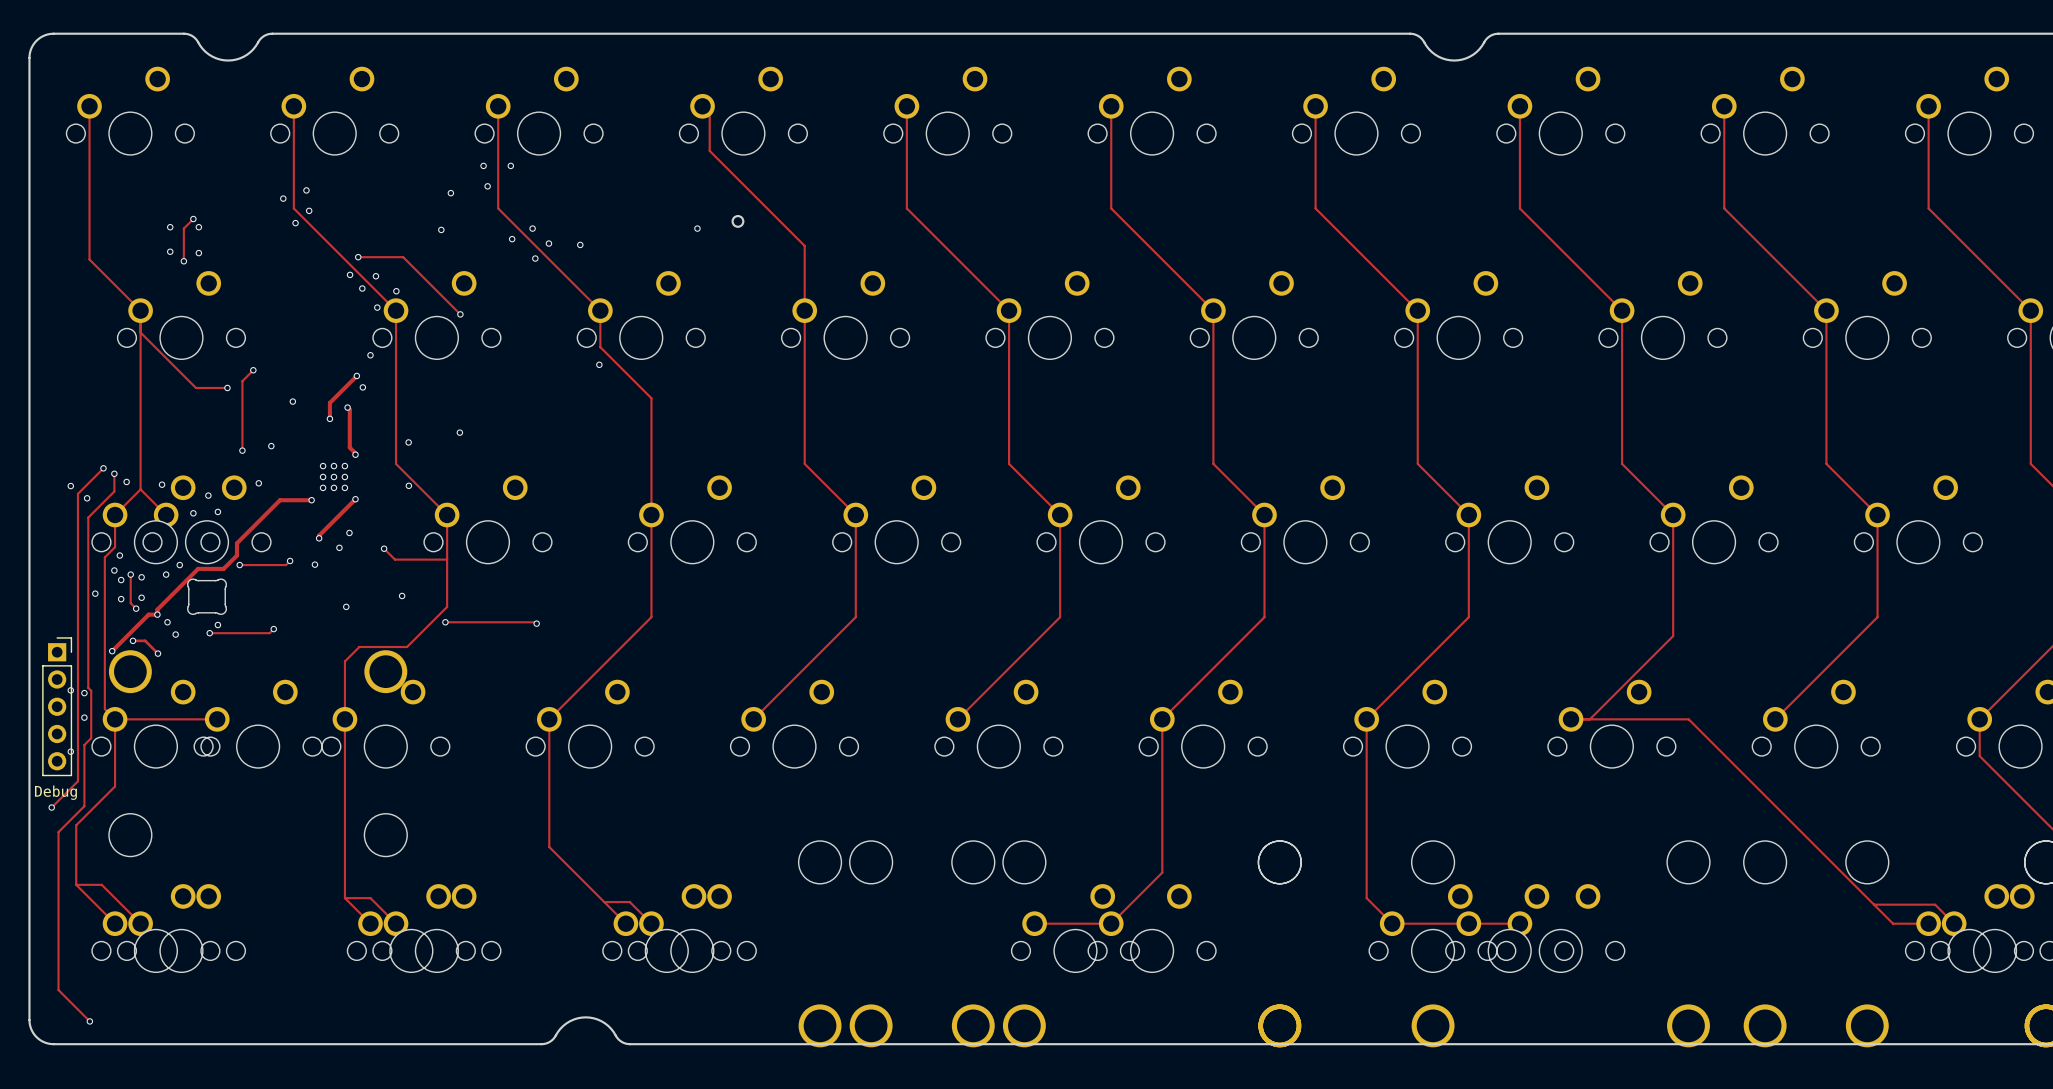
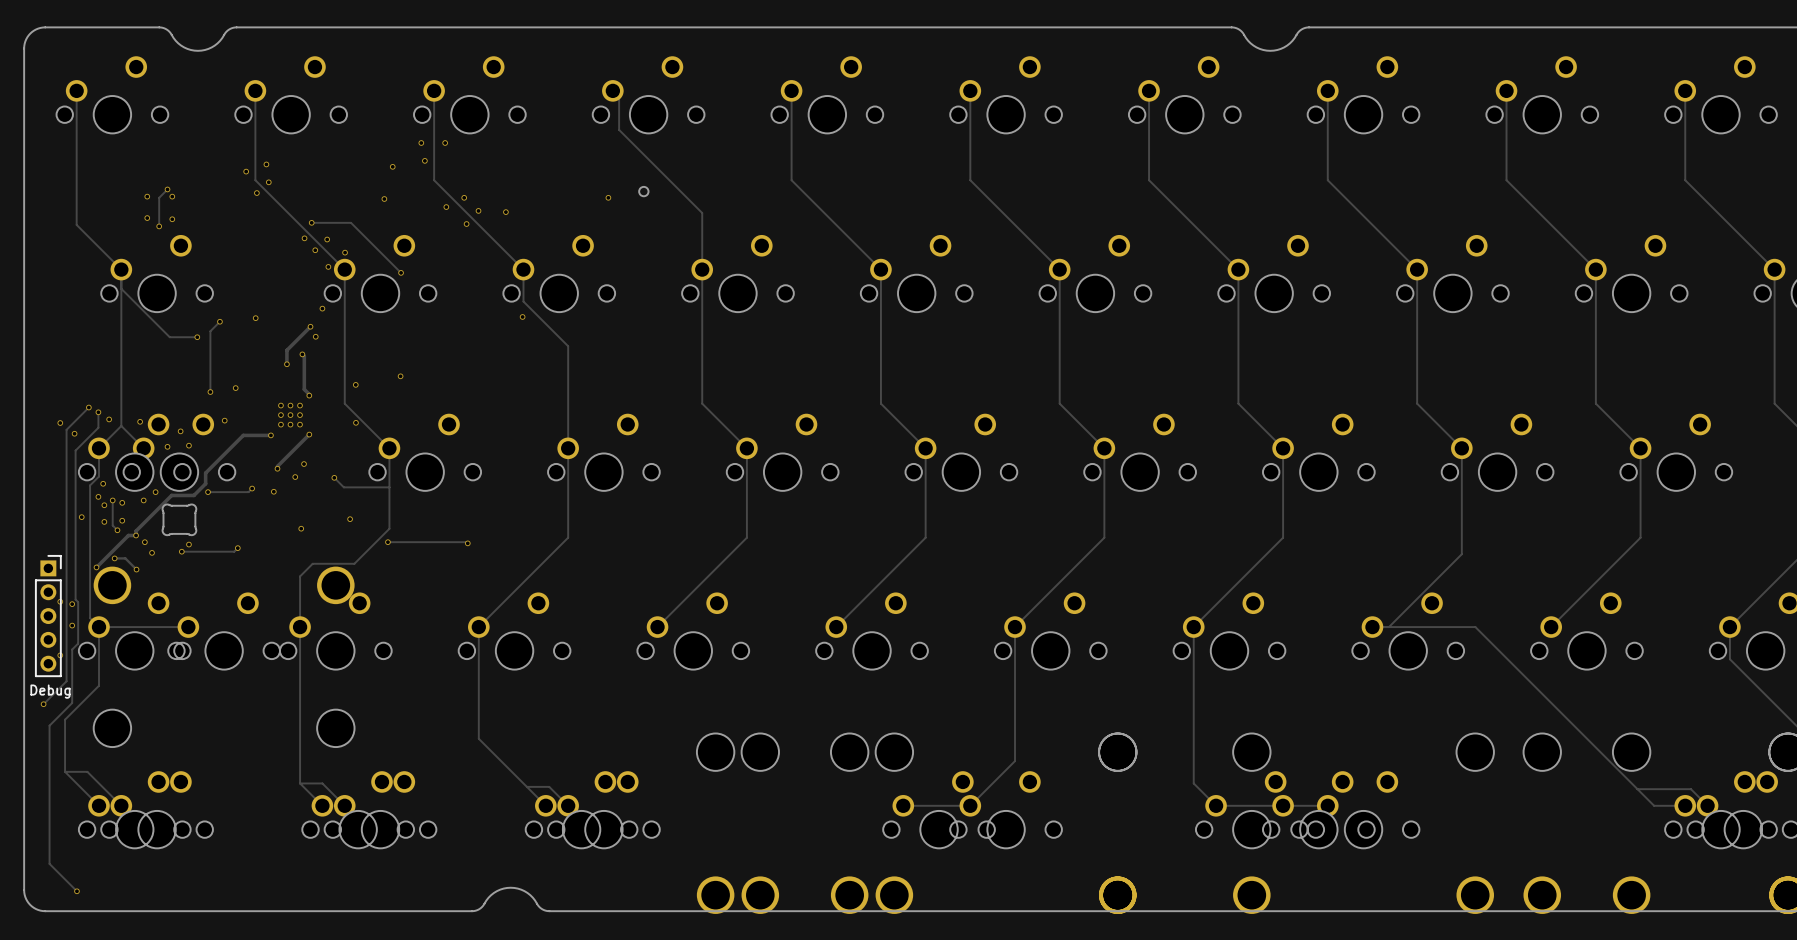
via position: (292, 401) -> (255, 318)

